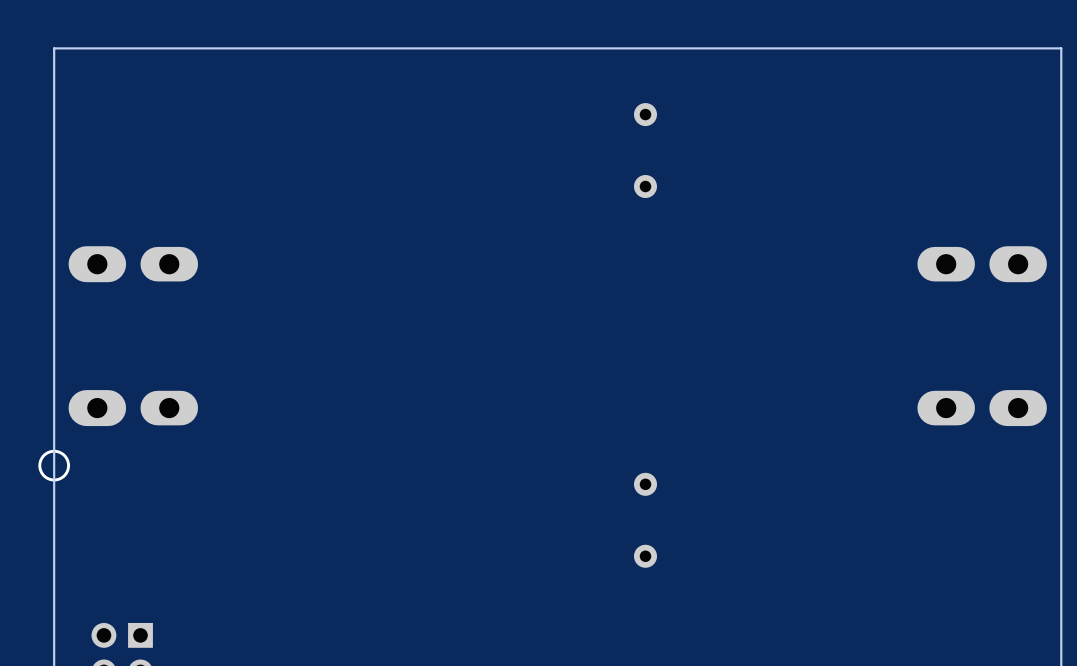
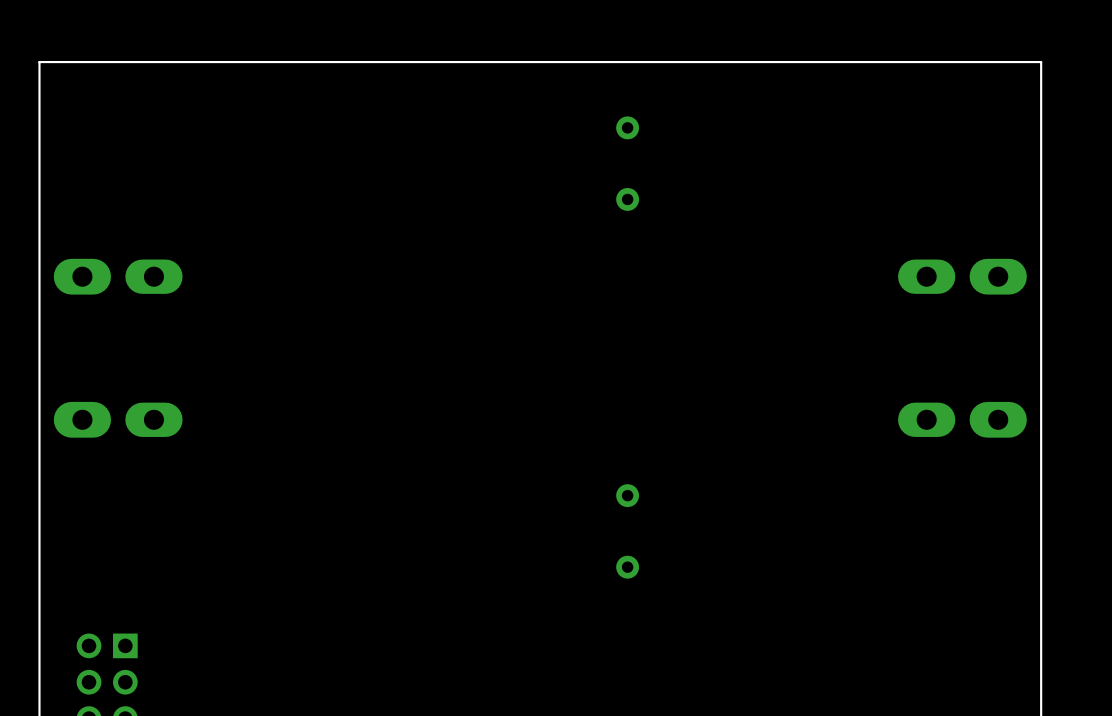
drawing: [38, 449, 71, 482] -> none

